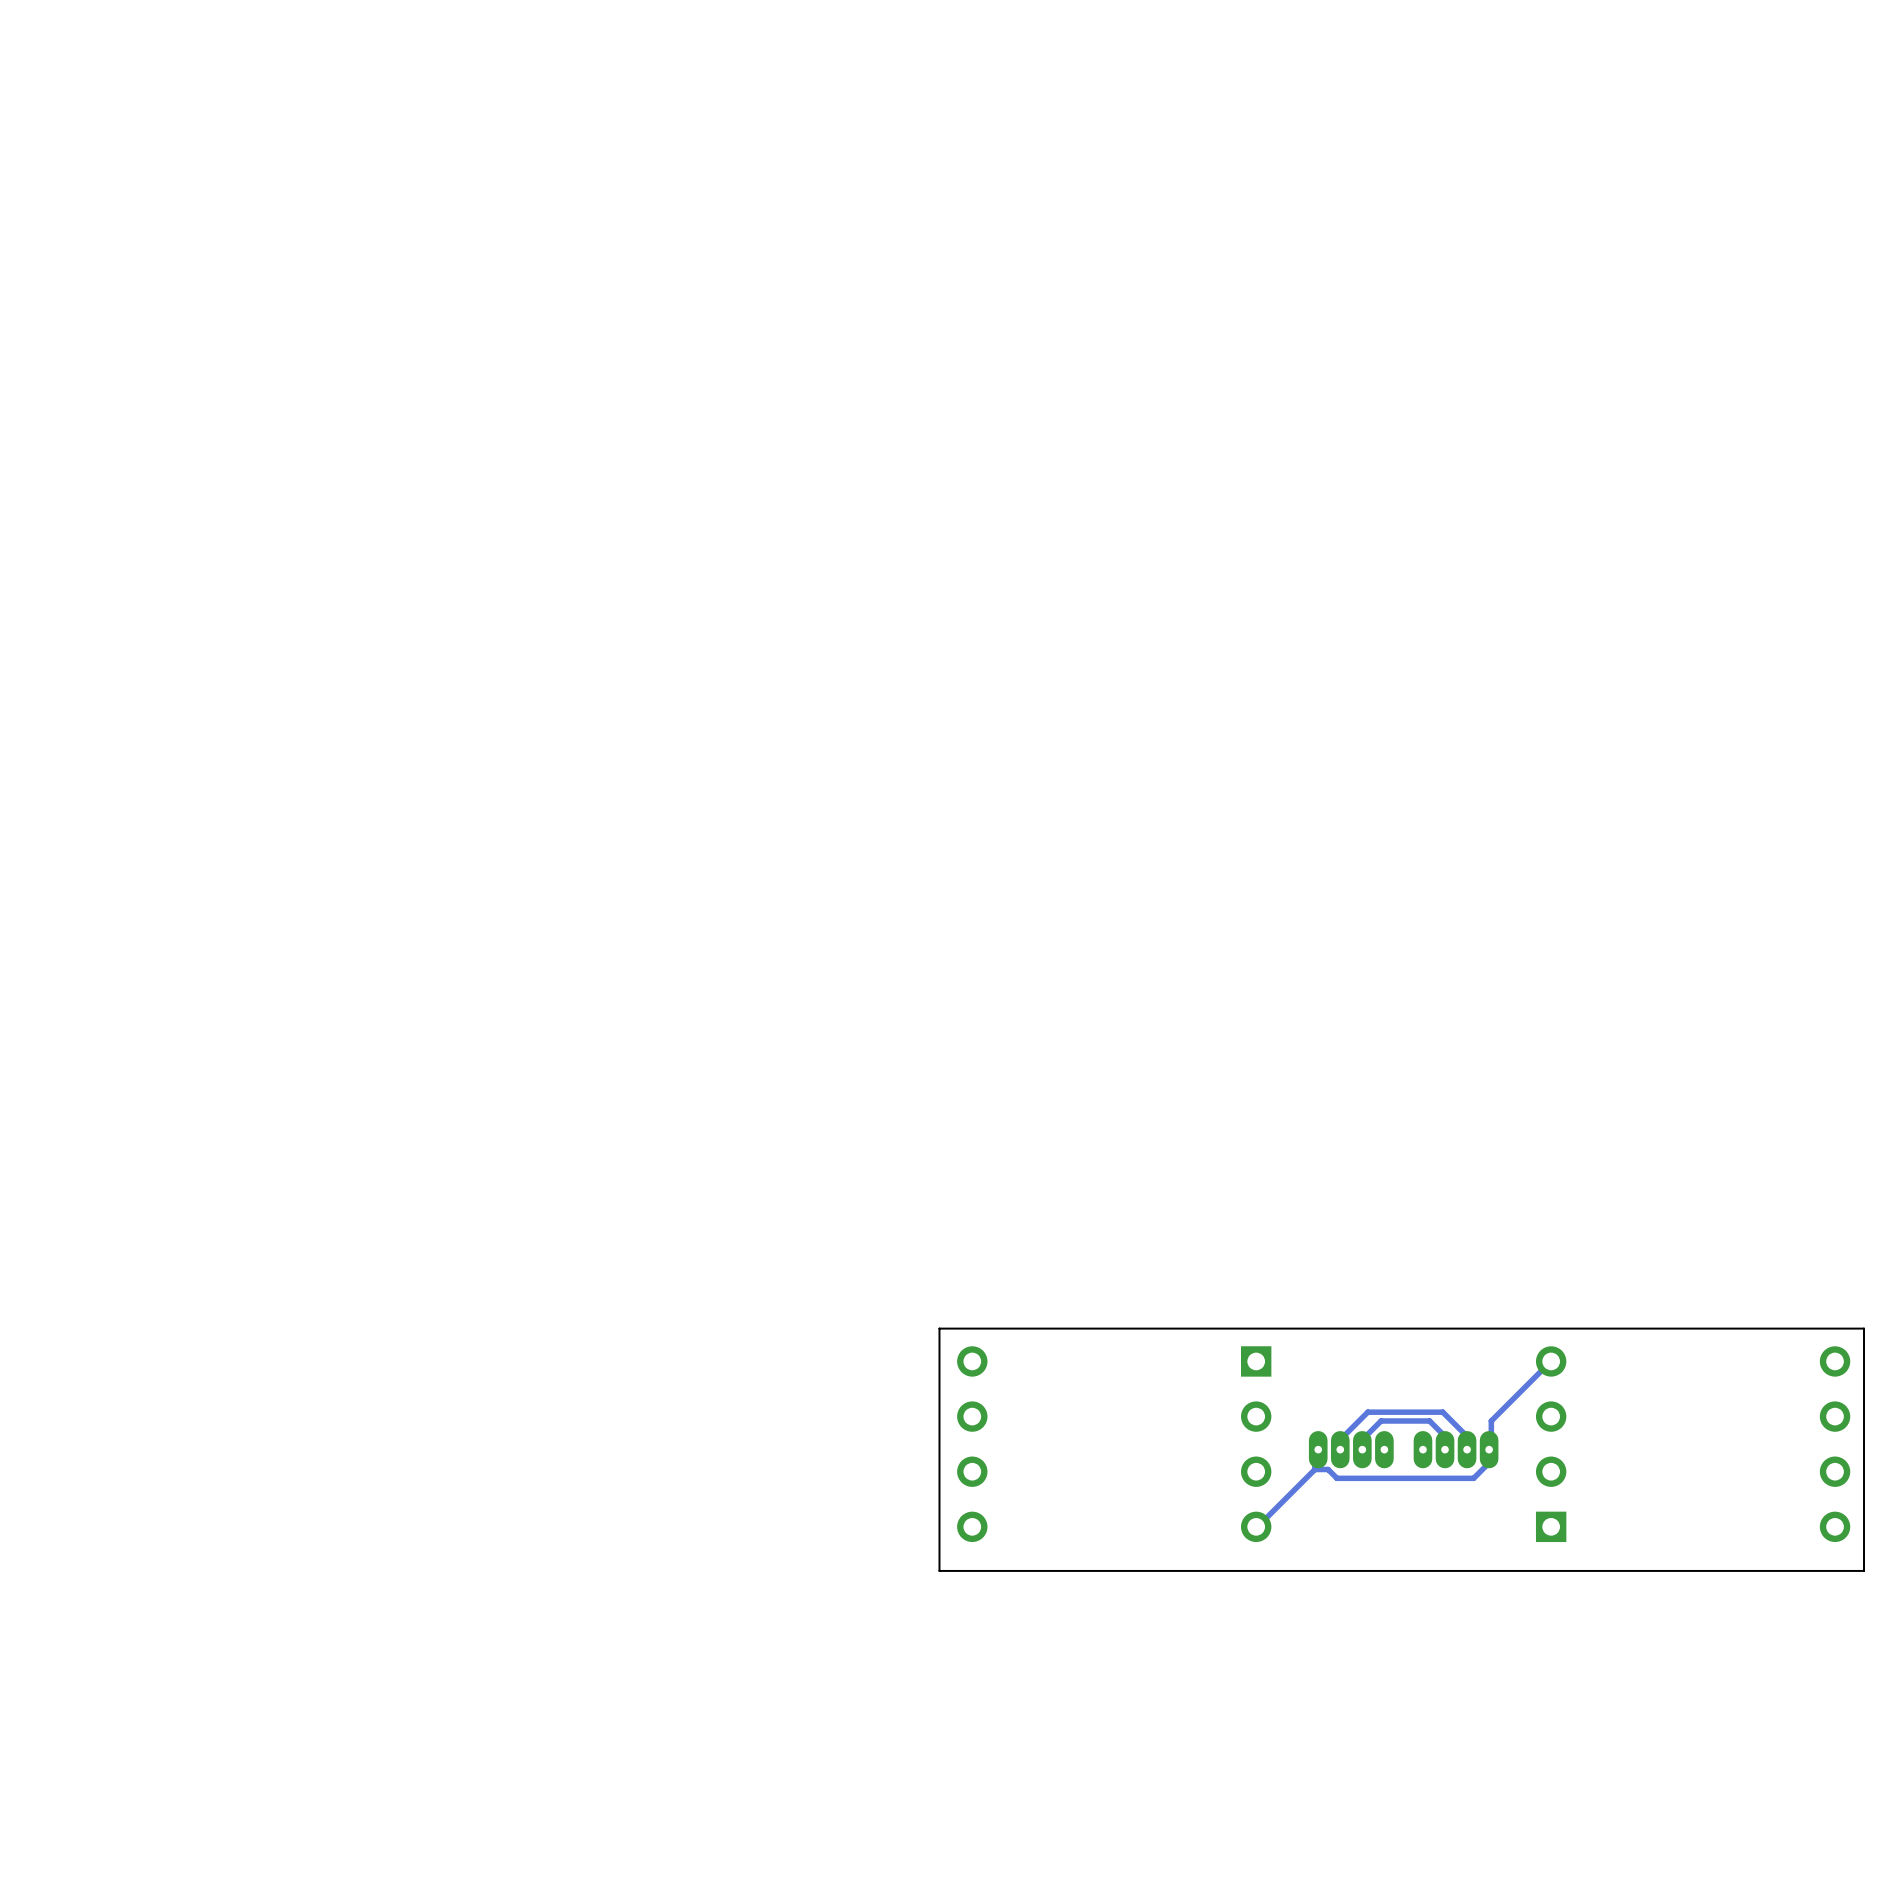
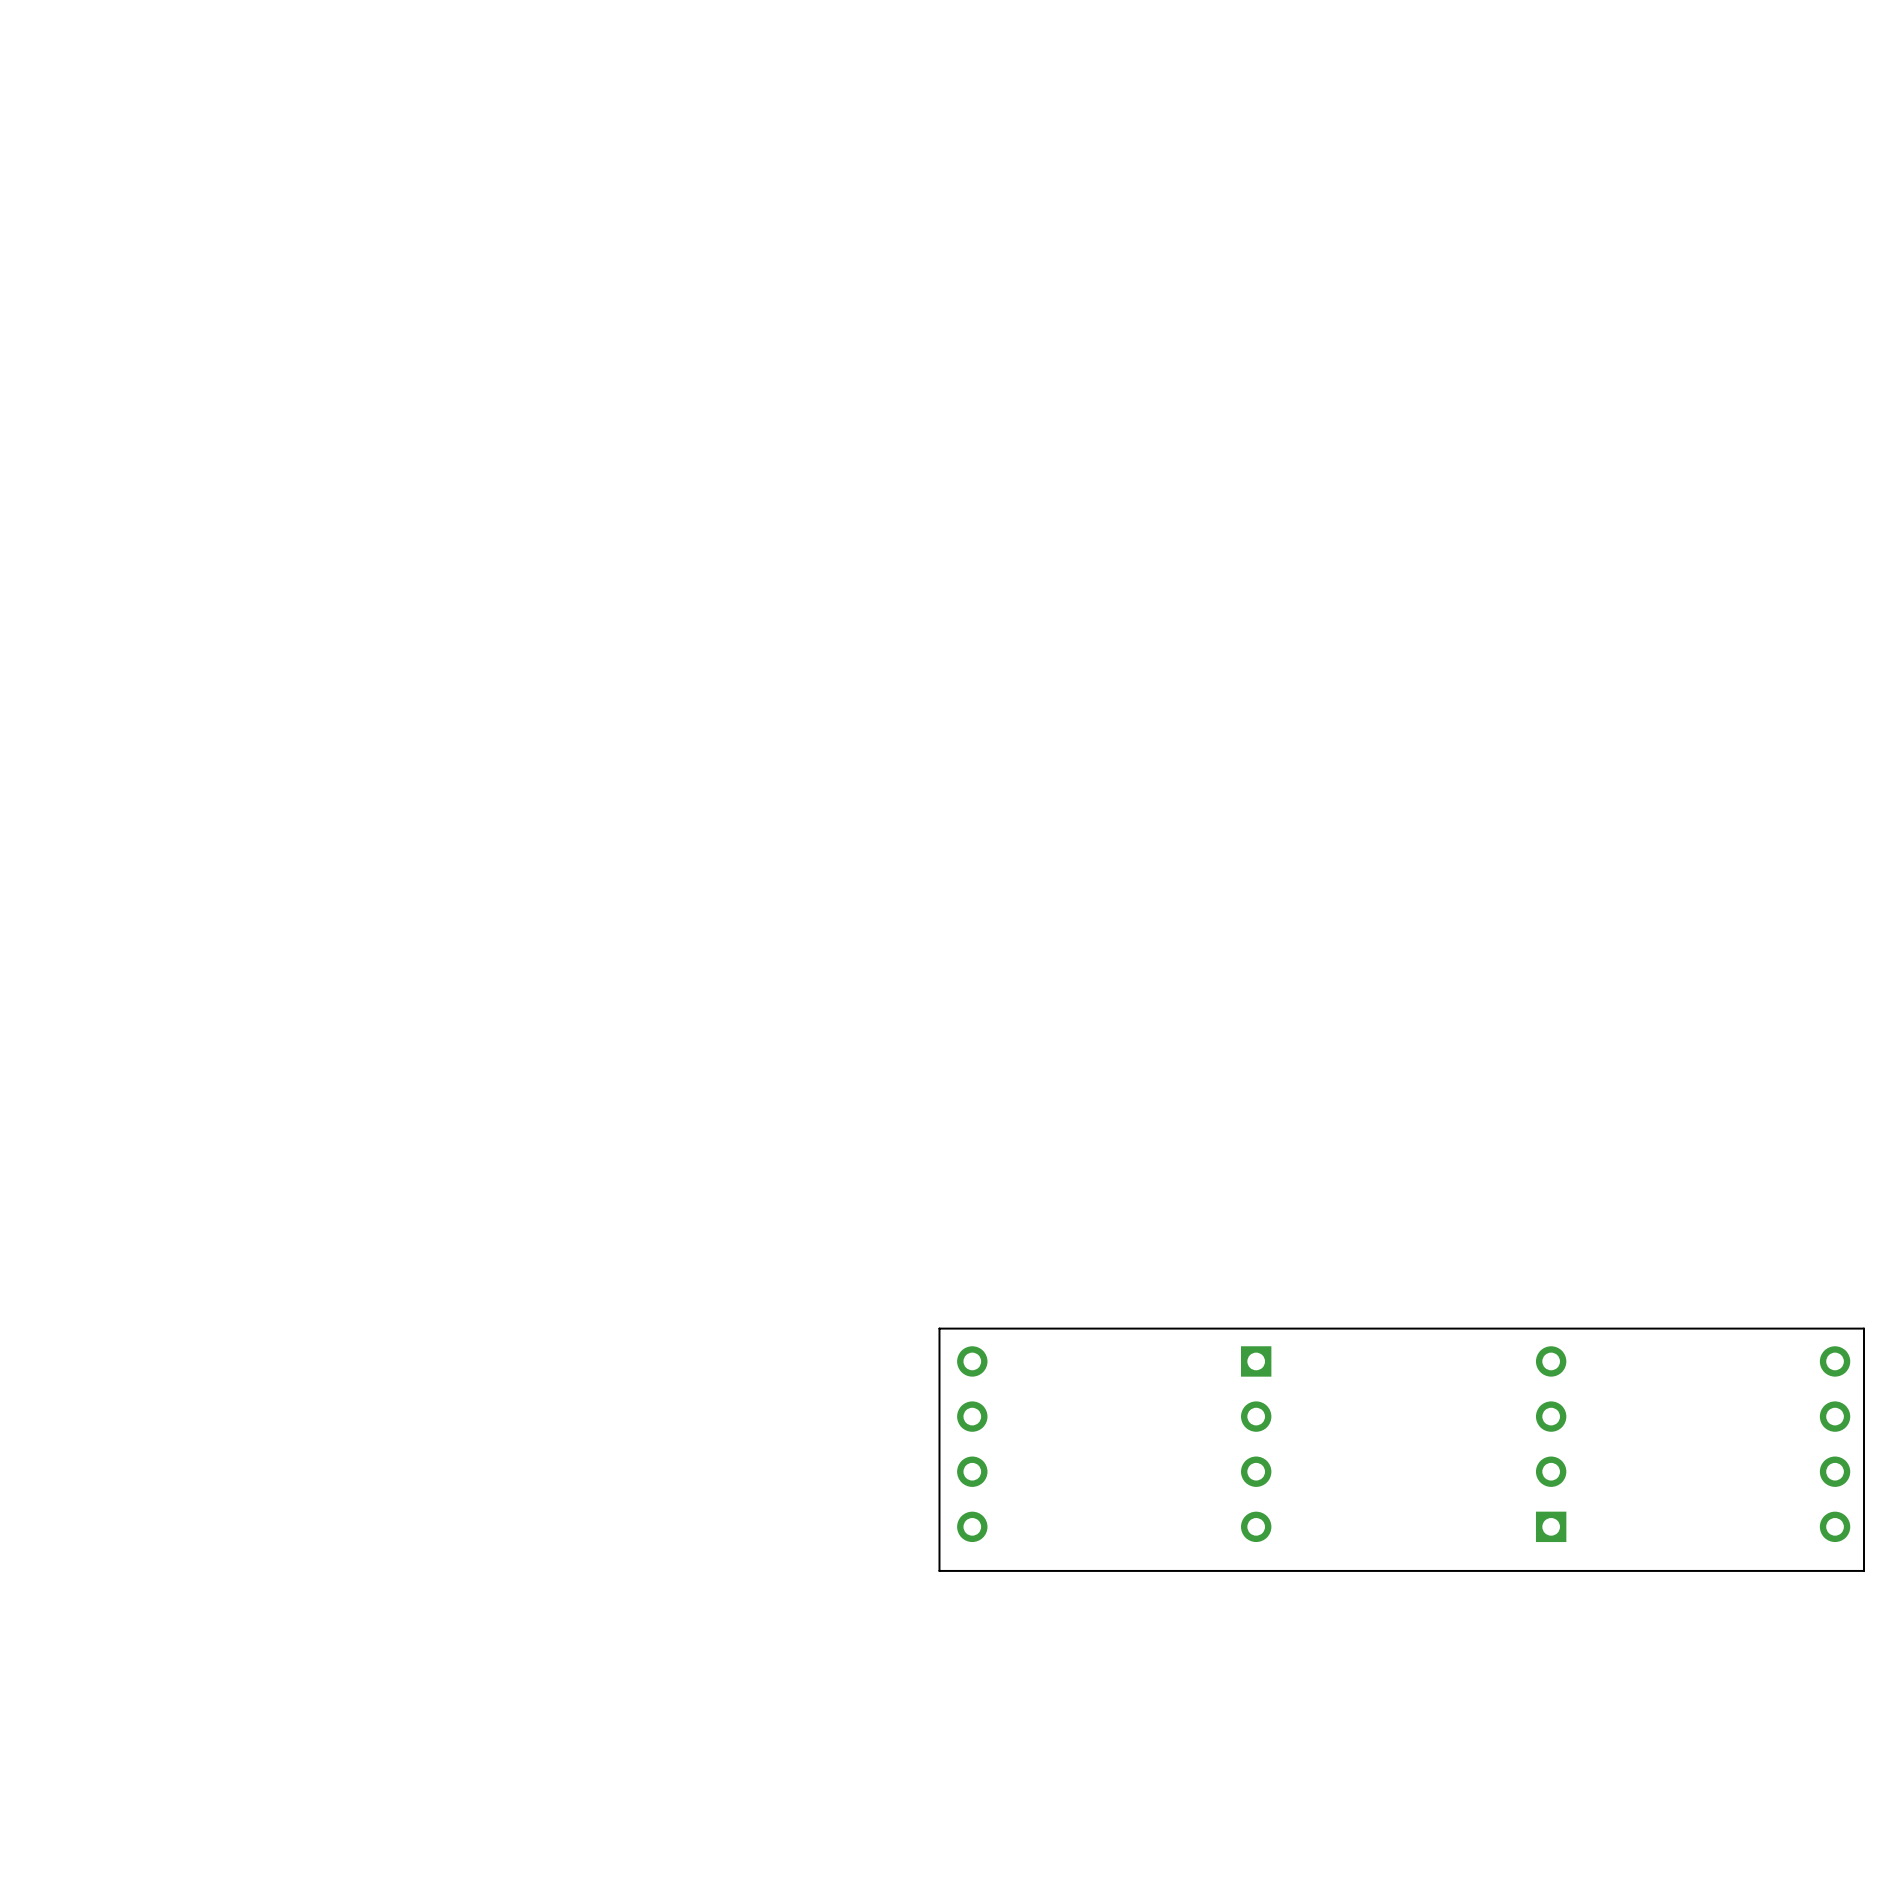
track: (1551, 1361) (1491, 1420) (1491, 1447) (1486, 1451) (1486, 1465) (1473, 1478) (1336, 1478) (1328, 1469) (1314, 1469) -> none
part: (1351, 1449) -> none
track: (1445, 1449) (1442, 1447) (1442, 1434) (1429, 1420) (1381, 1420) (1363, 1438) (1362, 1449) -> none
part: (1456, 1449) -> none
track: (1467, 1449) (1464, 1447) (1464, 1434) (1442, 1412) (1367, 1412) (1341, 1438) (1340, 1449) -> none
track: (1314, 1469) (1256, 1526) -> none

